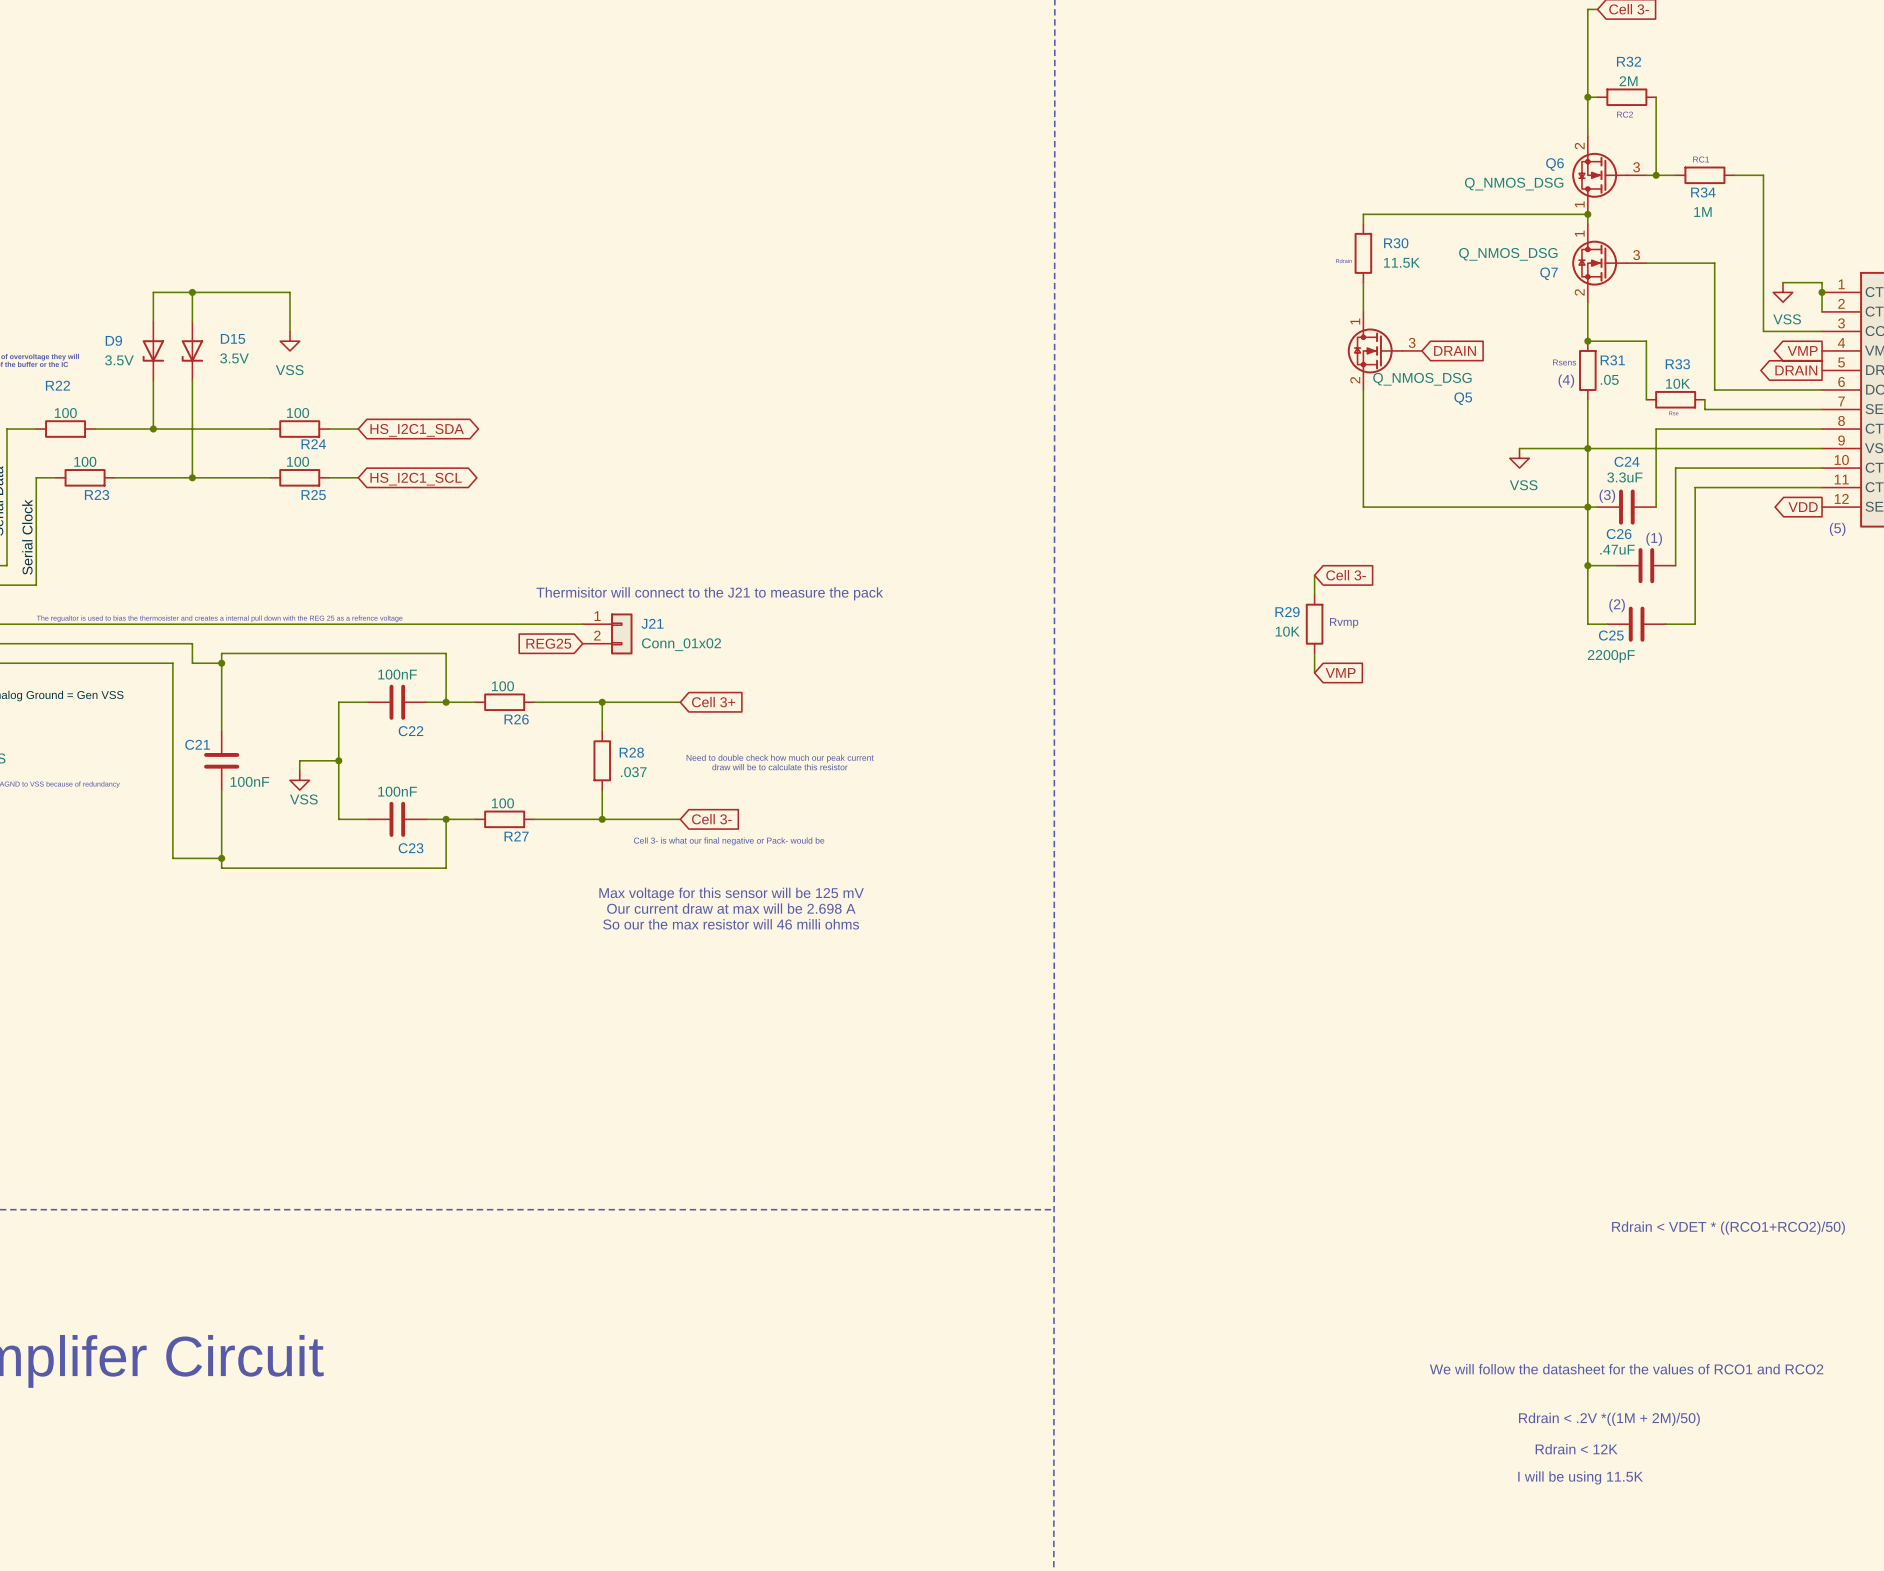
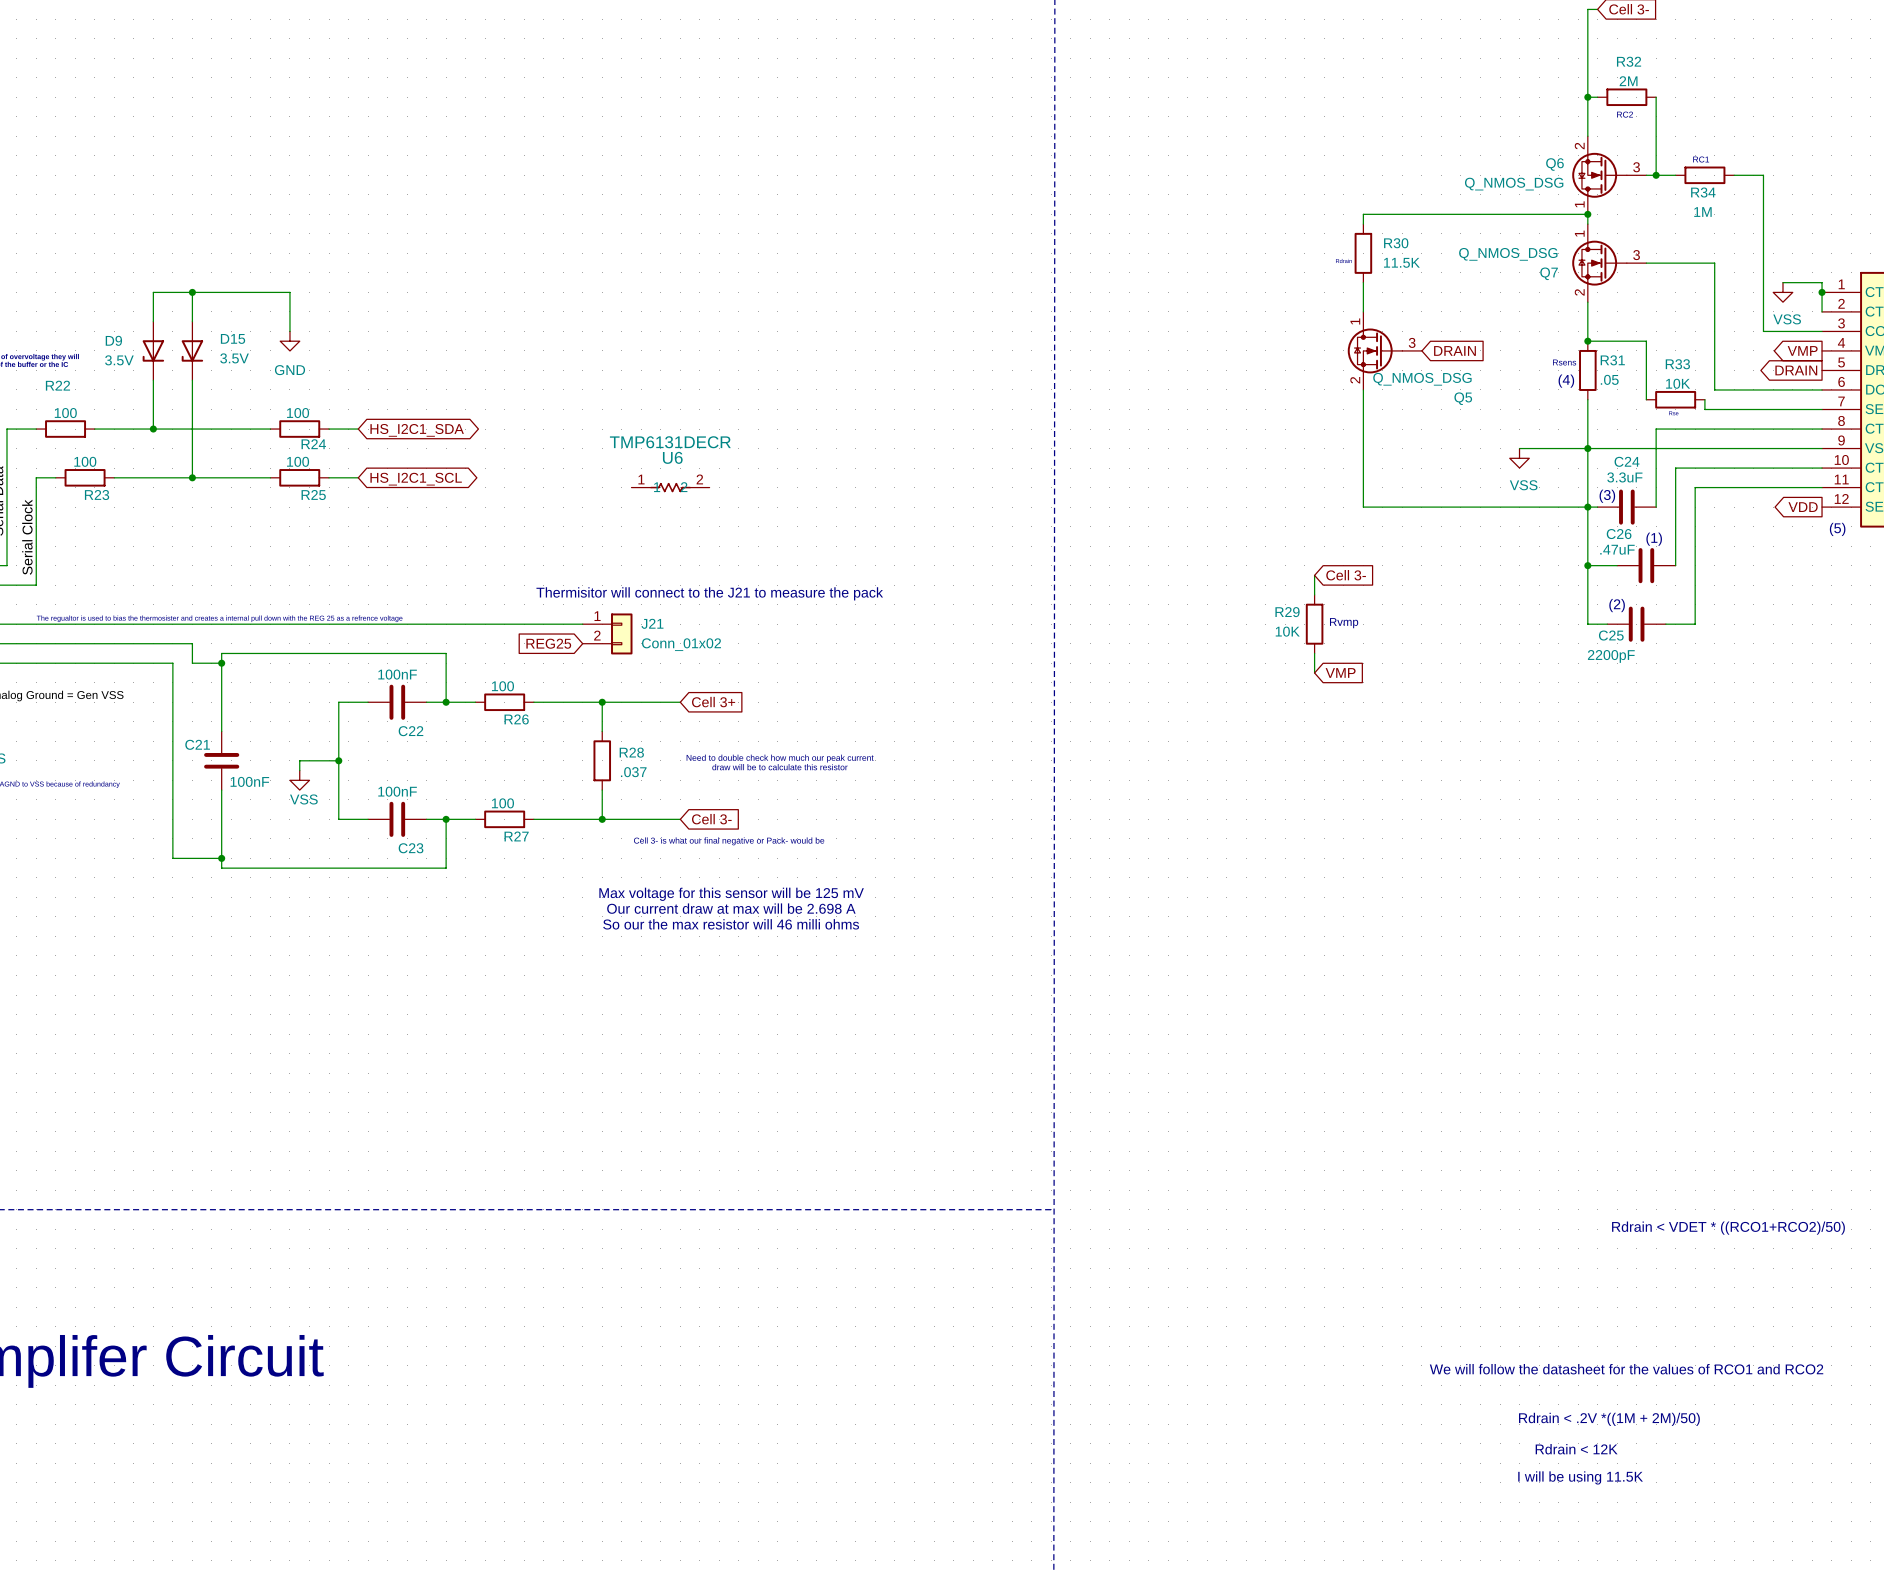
power symbol: VSS (289, 341) -> GND (289, 341)
U6: none -> TMP6131DECR (670, 487)

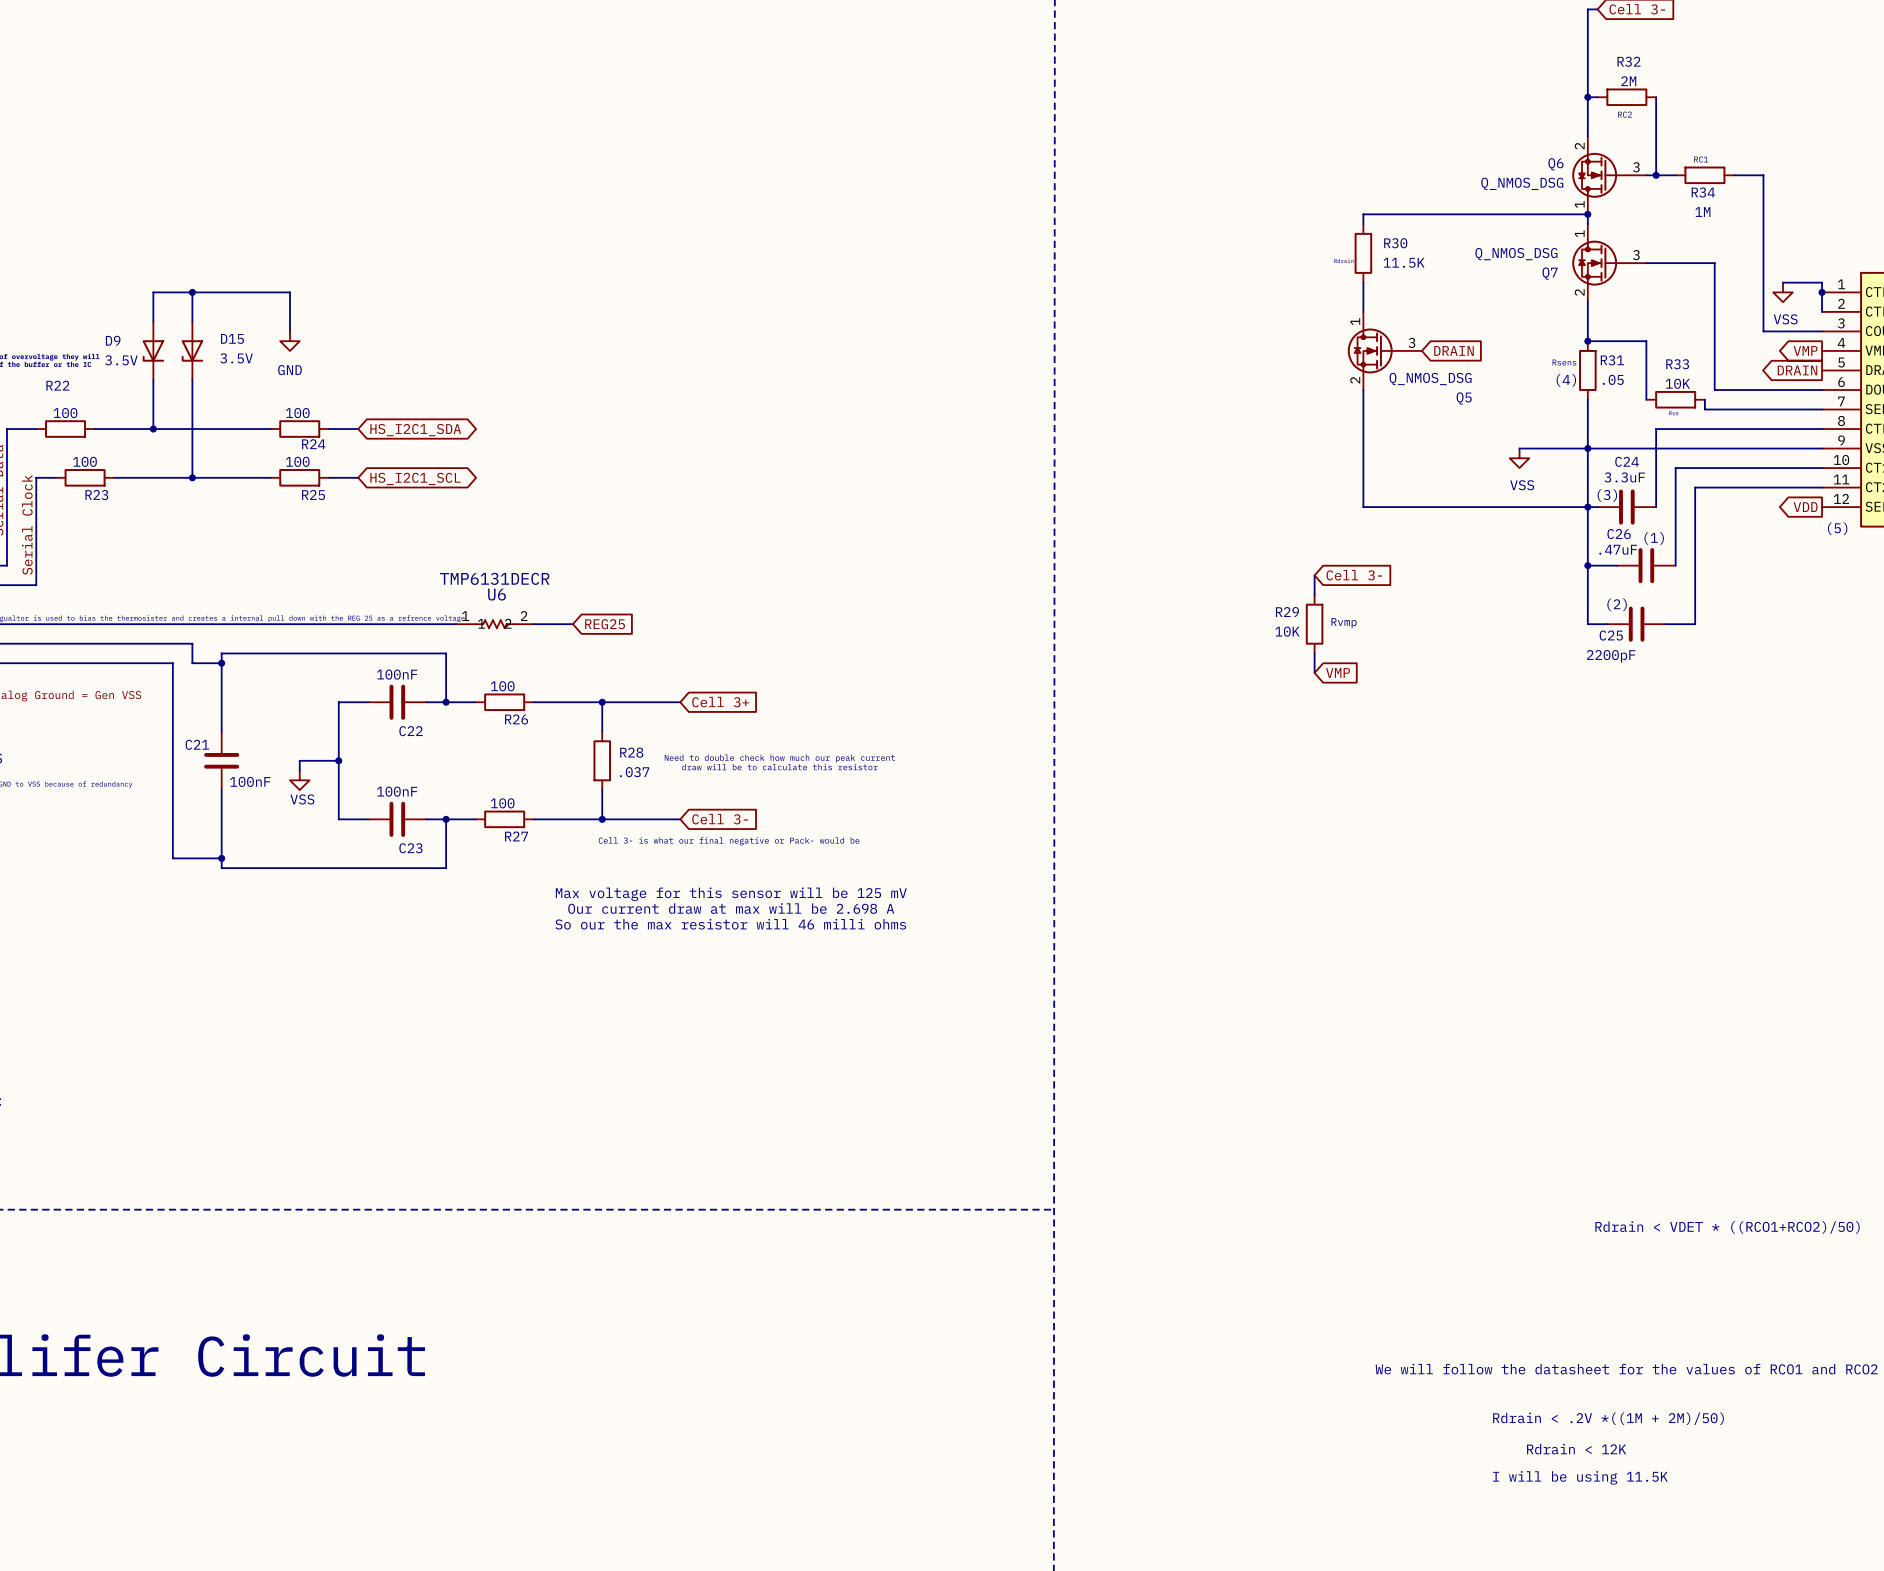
U6 position: (670, 487) -> (494, 624)
text: Thermisitor will connect to the J21 to measure the pack (709, 593) -> none
wire: (572, 624) (582, 624) -> none
J21: Conn_01x02 (607, 633) -> none
global label rotation: 0° (548, 643) -> 180° (605, 624)

